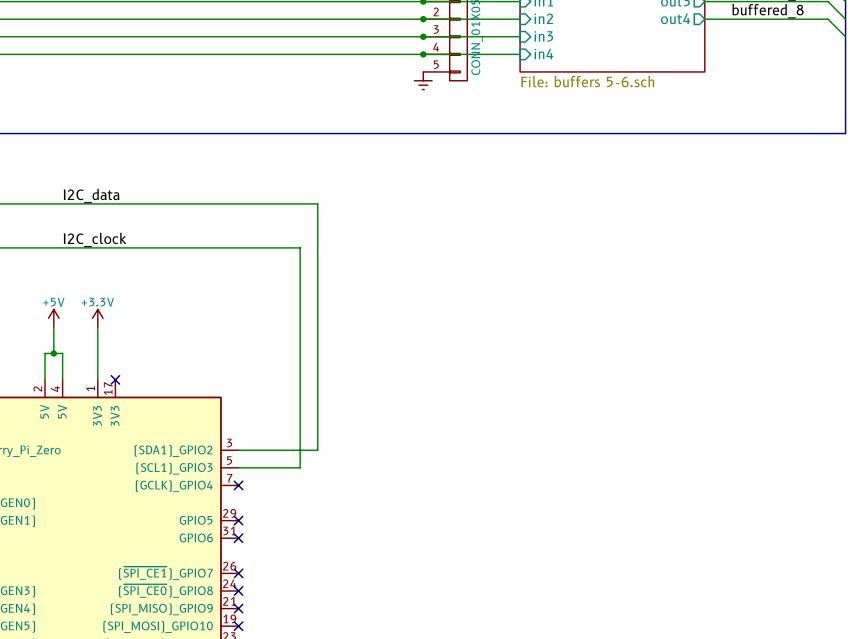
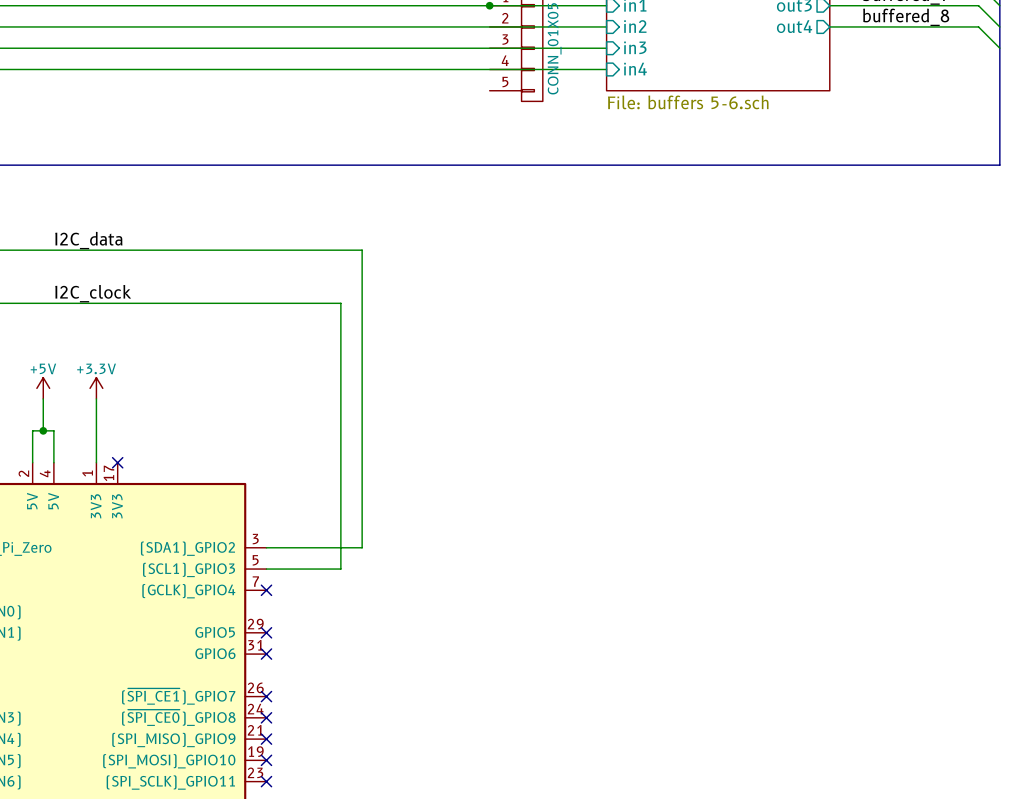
junction: (423, 19) -> none
junction: (423, 36) -> none
junction: (423, 54) -> none
power symbol: (423, 80) -> none

